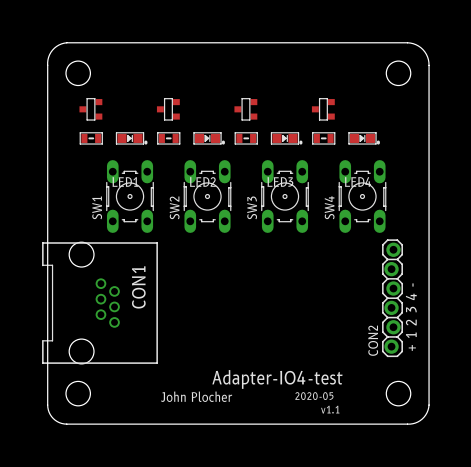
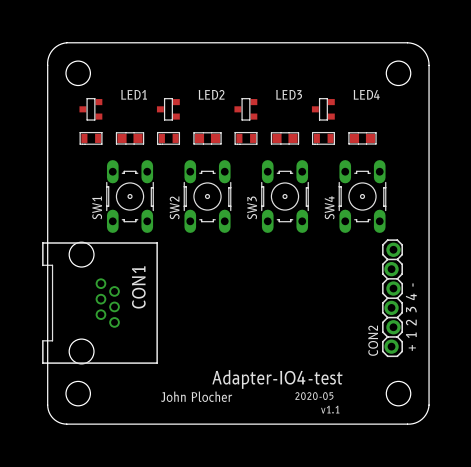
part footprint: [79, 132, 103, 145] -> [79, 131, 103, 145]
LED1 footprint: [115, 132, 148, 145] -> [115, 132, 145, 145]
part footprint: [157, 132, 181, 145] -> [157, 131, 181, 145]
LED2 footprint: [193, 132, 225, 145] -> [193, 132, 222, 145]
part footprint: [234, 132, 258, 145] -> [234, 131, 258, 145]
LED3 footprint: [270, 132, 303, 145] -> [270, 132, 300, 145]
part footprint: [312, 132, 336, 145] -> [312, 131, 335, 145]
LED4 footprint: [348, 132, 380, 145] -> [348, 132, 377, 145]
LED1 name position: LED1 (125, 181) -> LED1 (134, 94)
LED2 name position: LED2 (202, 181) -> LED2 (211, 94)
LED3 name position: LED3 (280, 181) -> LED3 (289, 94)
LED4 name position: LED4 (358, 181) -> LED4 (366, 94)

